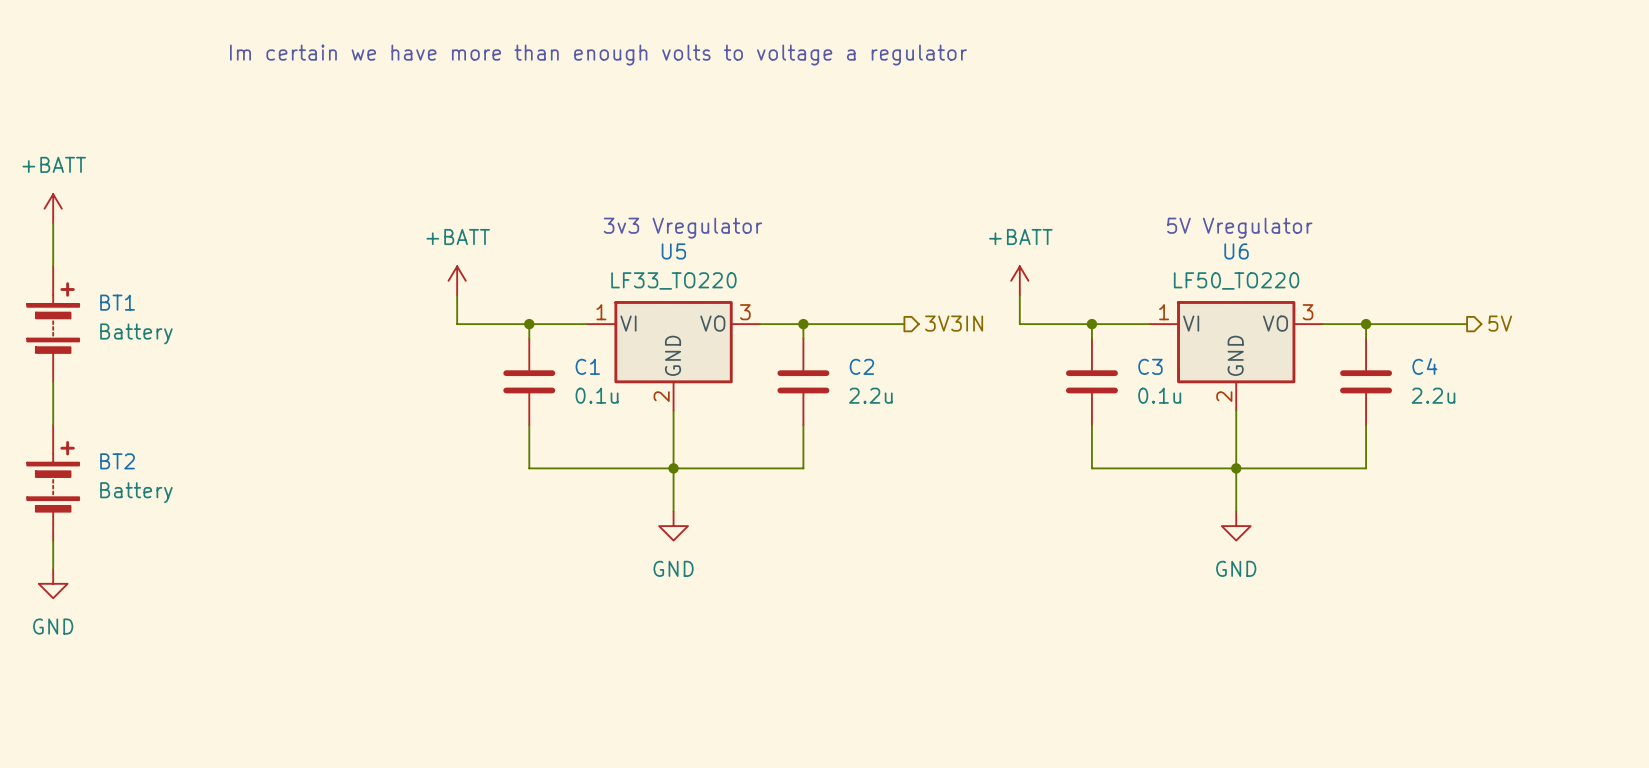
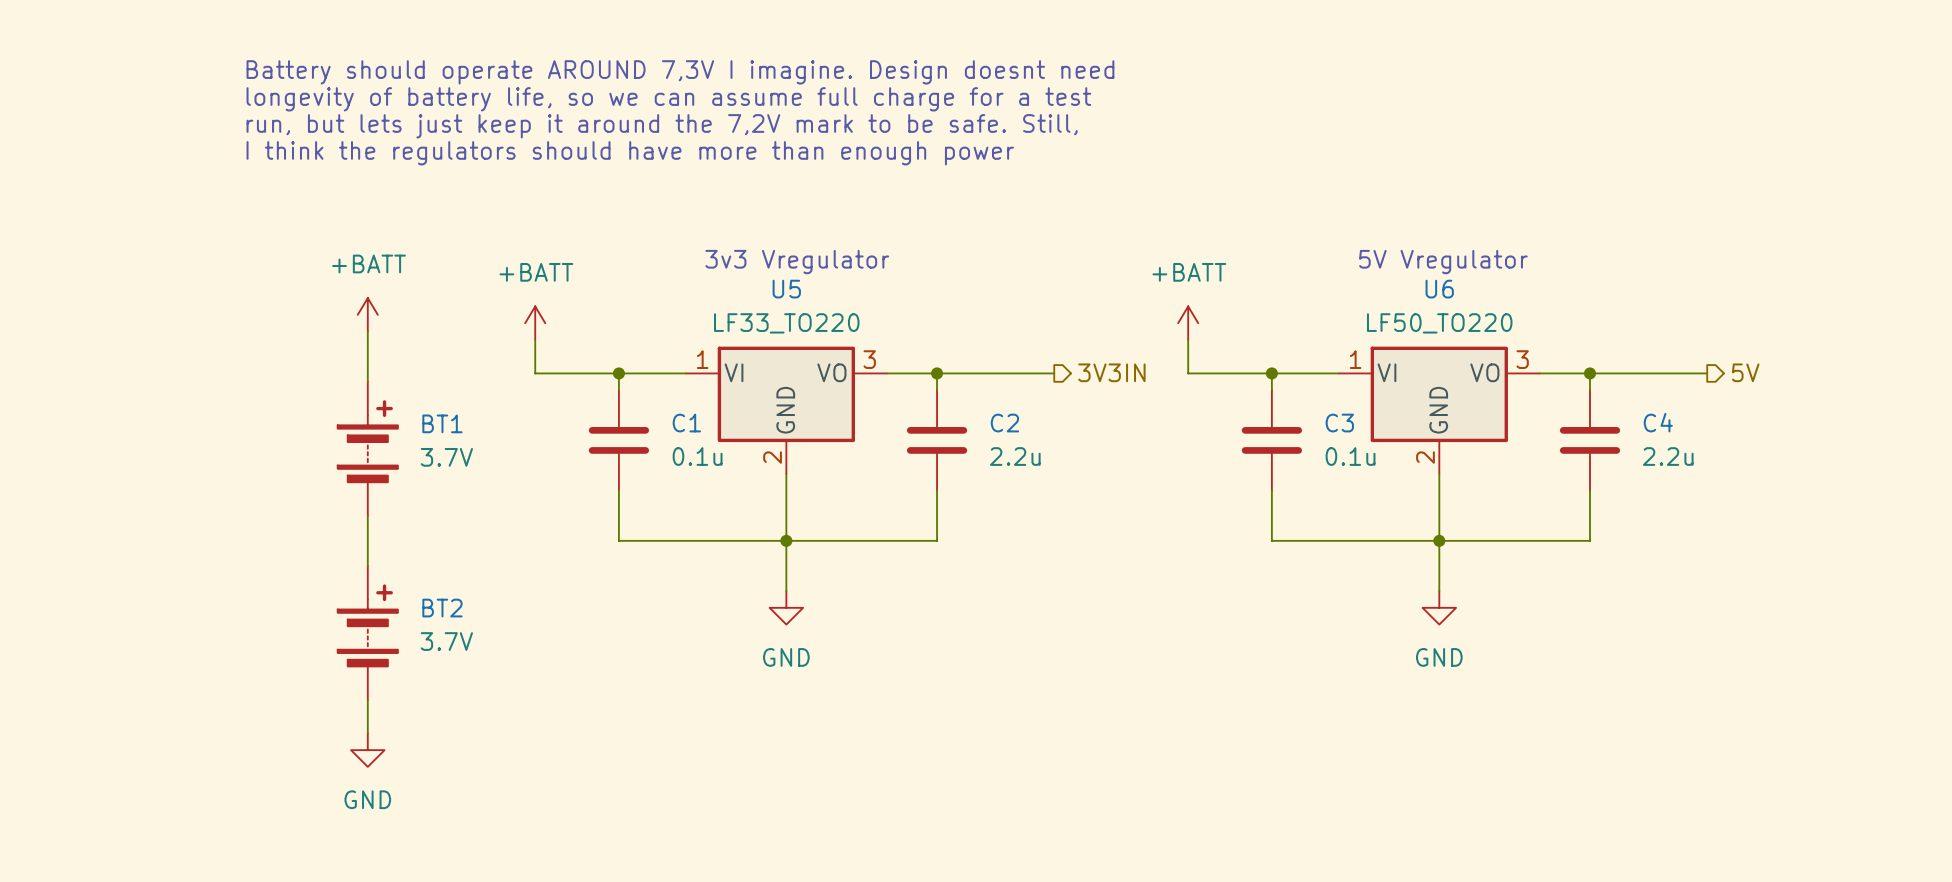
text: Im certain we have more than enough volts to voltage a regulator (598, 55) -> none
text: none -> Battery should operate AROUND 7,3V I imagine. Design doesnt need (680, 72)
text: none -> longevity of battery life, so we can assume full charge for a test (668, 99)
text: none -> run, but lets just keep it around the 7,2V mark to be safe. Still, (662, 126)
text: none -> I think the regulators should have more than enough power (630, 153)
power symbol position: +BATT (53, 208) -> +BATT (367, 314)
wire: (53, 223) (53, 266) -> (367, 331) (367, 381)
BT1 position: (53, 324) -> (367, 448)
BT1 value: Battery (136, 333) -> 3.7V (446, 457)
wire: (53, 381) (53, 425) -> (367, 515) (367, 565)
BT2 position: (53, 482) -> (367, 632)
BT2 value: Battery (136, 492) -> 3.7V (446, 641)
wire: (53, 540) (53, 569) -> (367, 699) (367, 733)
power symbol position: GND (53, 583) -> GND (367, 750)

